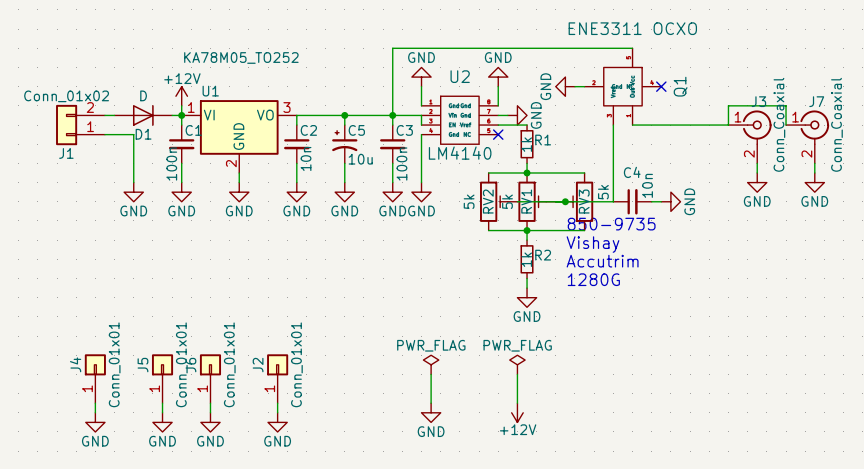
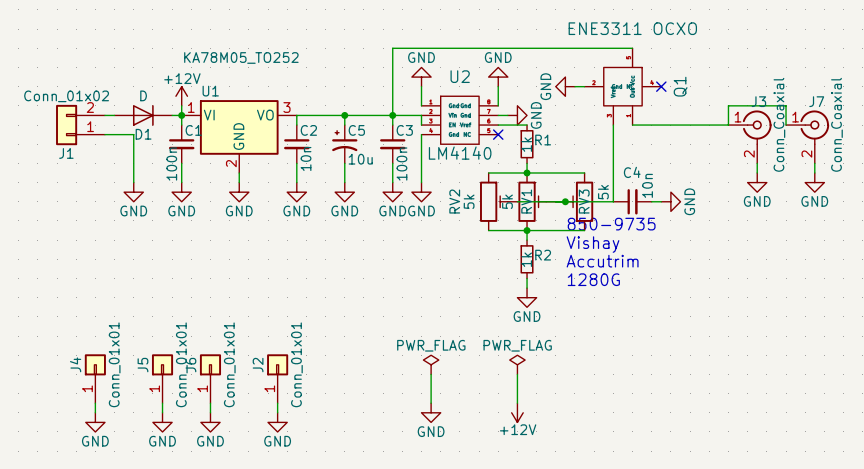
RV2 name position: RV2 (488, 201) -> RV2 (454, 201)

